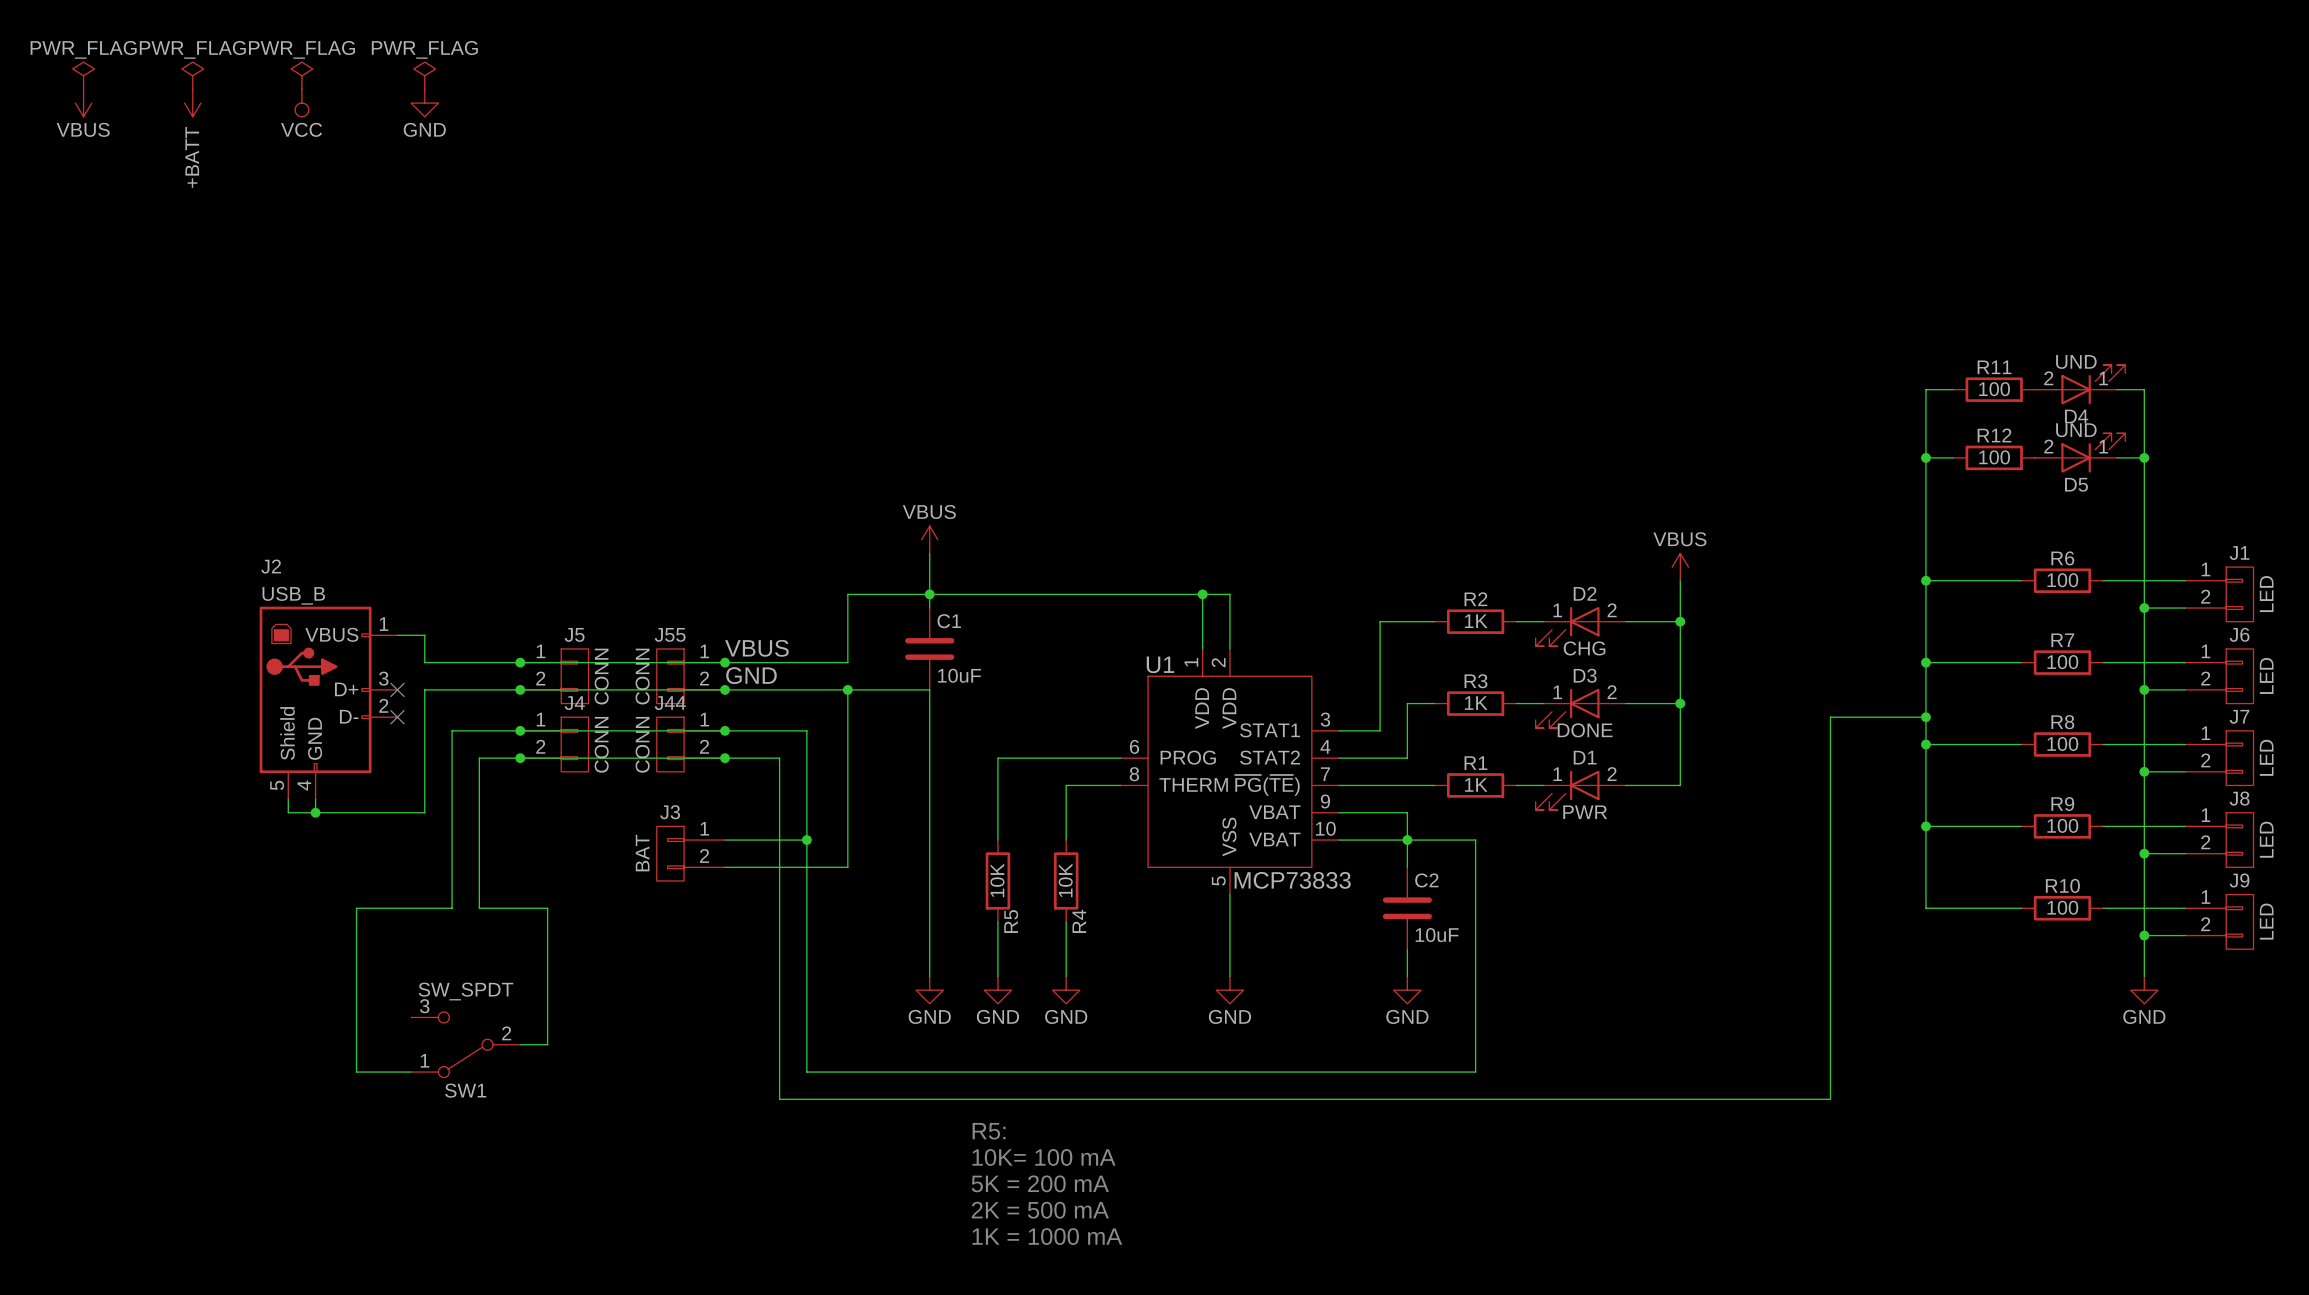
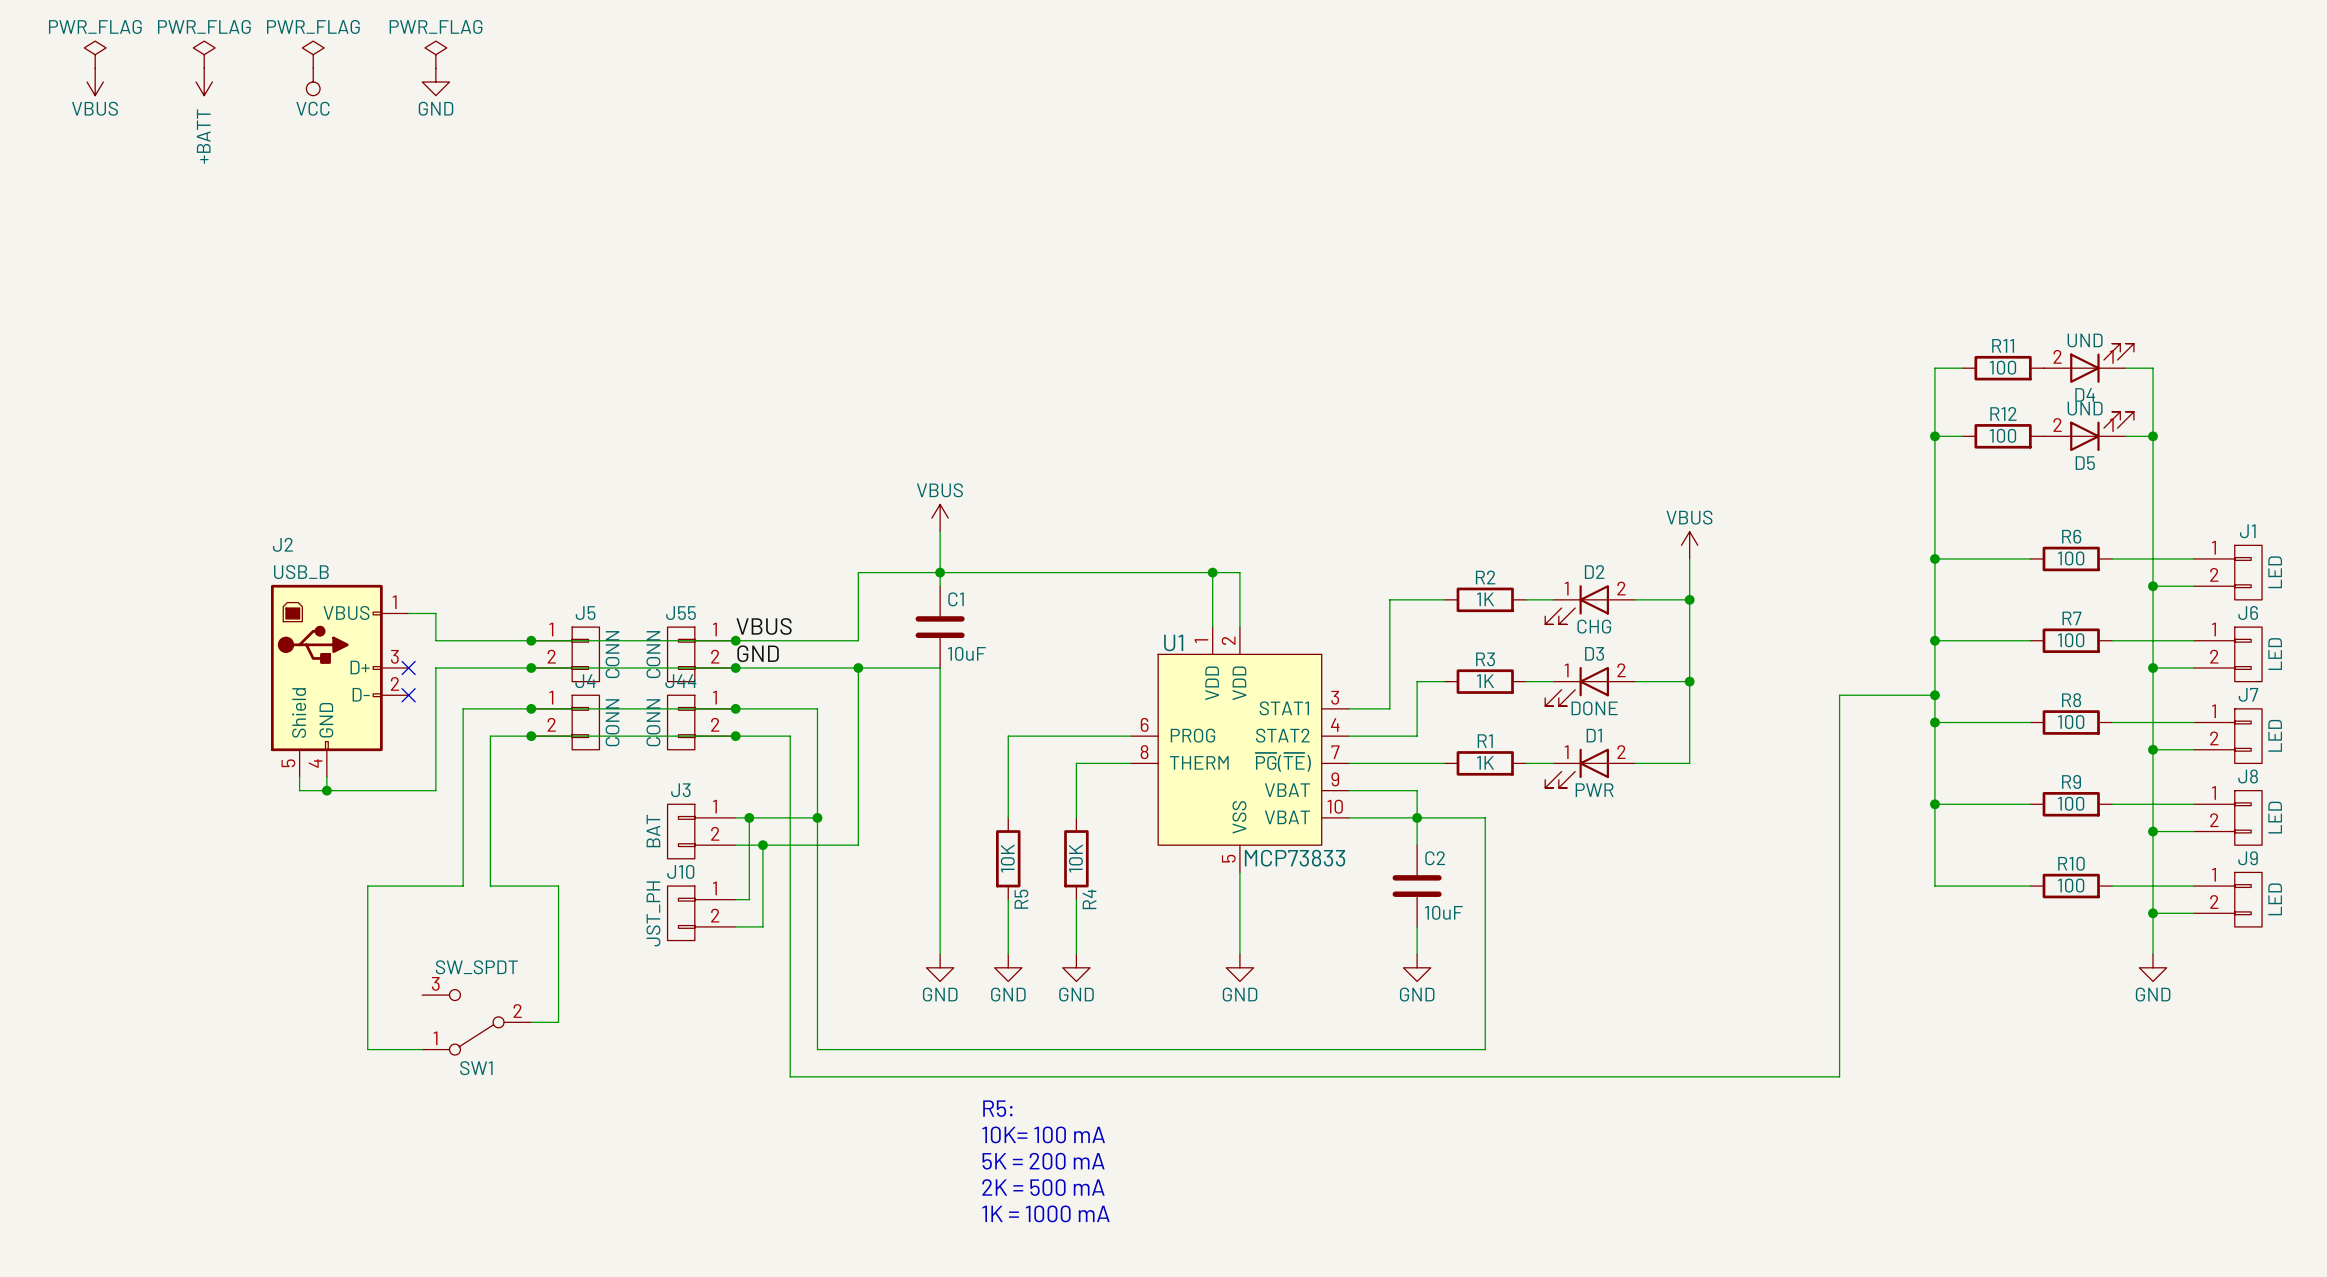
wire: none -> (749, 817) (749, 899) (735, 899)
junction: none -> (749, 817)
wire: none -> (762, 845) (762, 926) (735, 926)
junction: none -> (762, 845)
J10: none -> JST_PH (701, 913)

